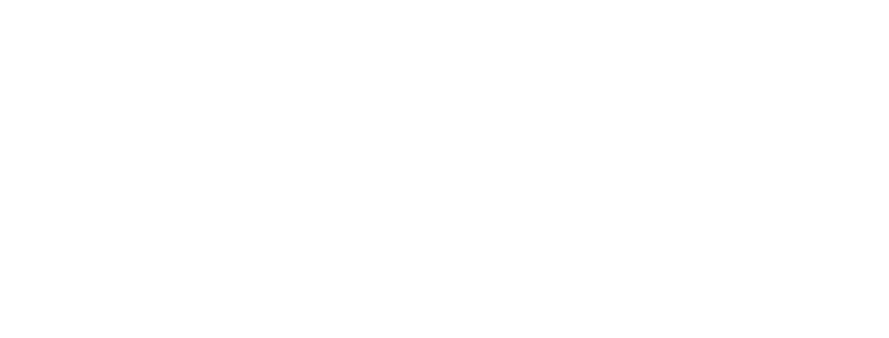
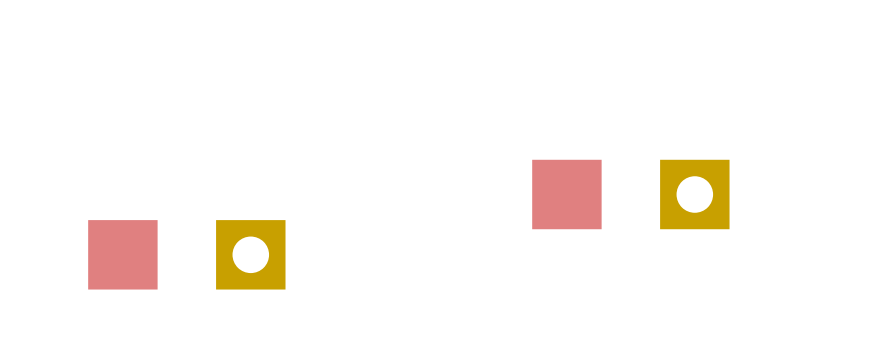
part: none -> (630, 194)
part: none -> (186, 254)

